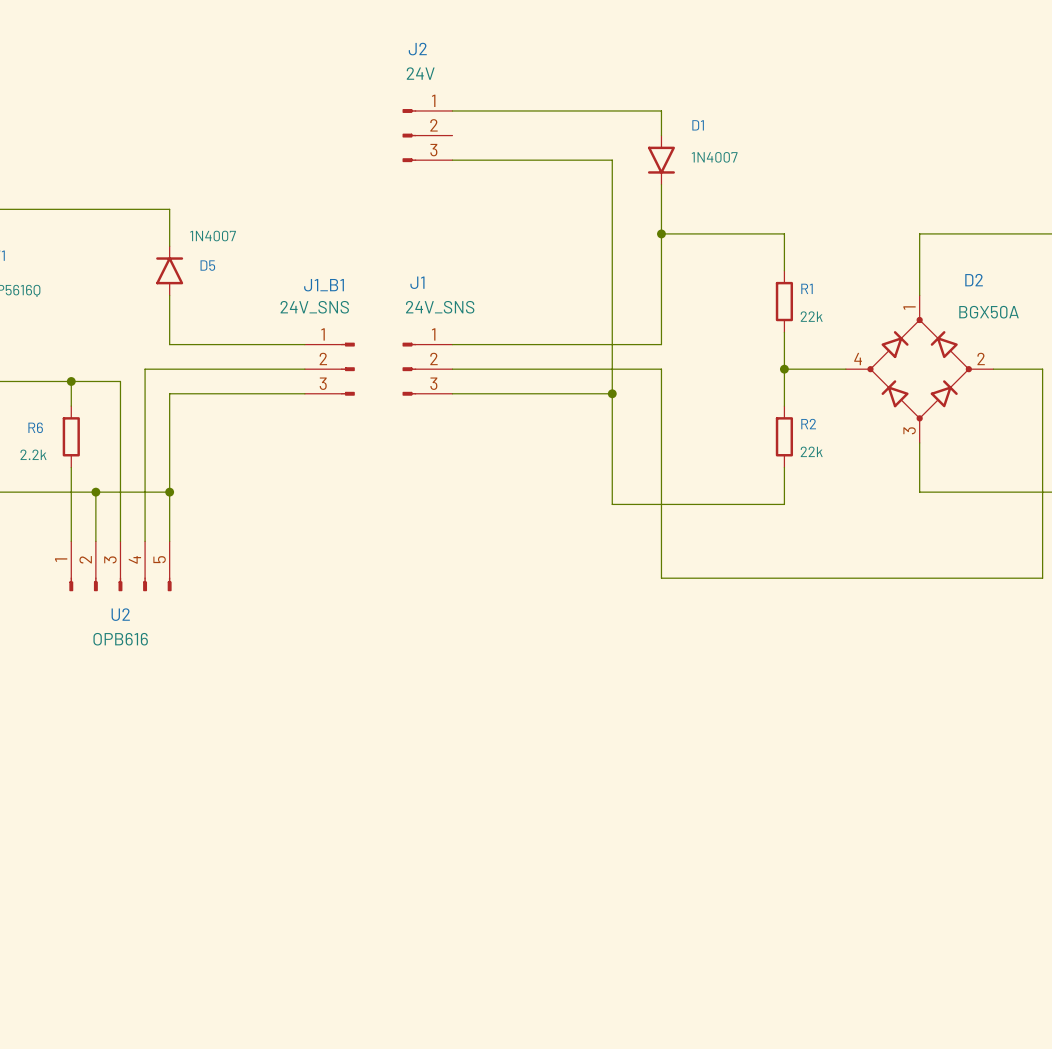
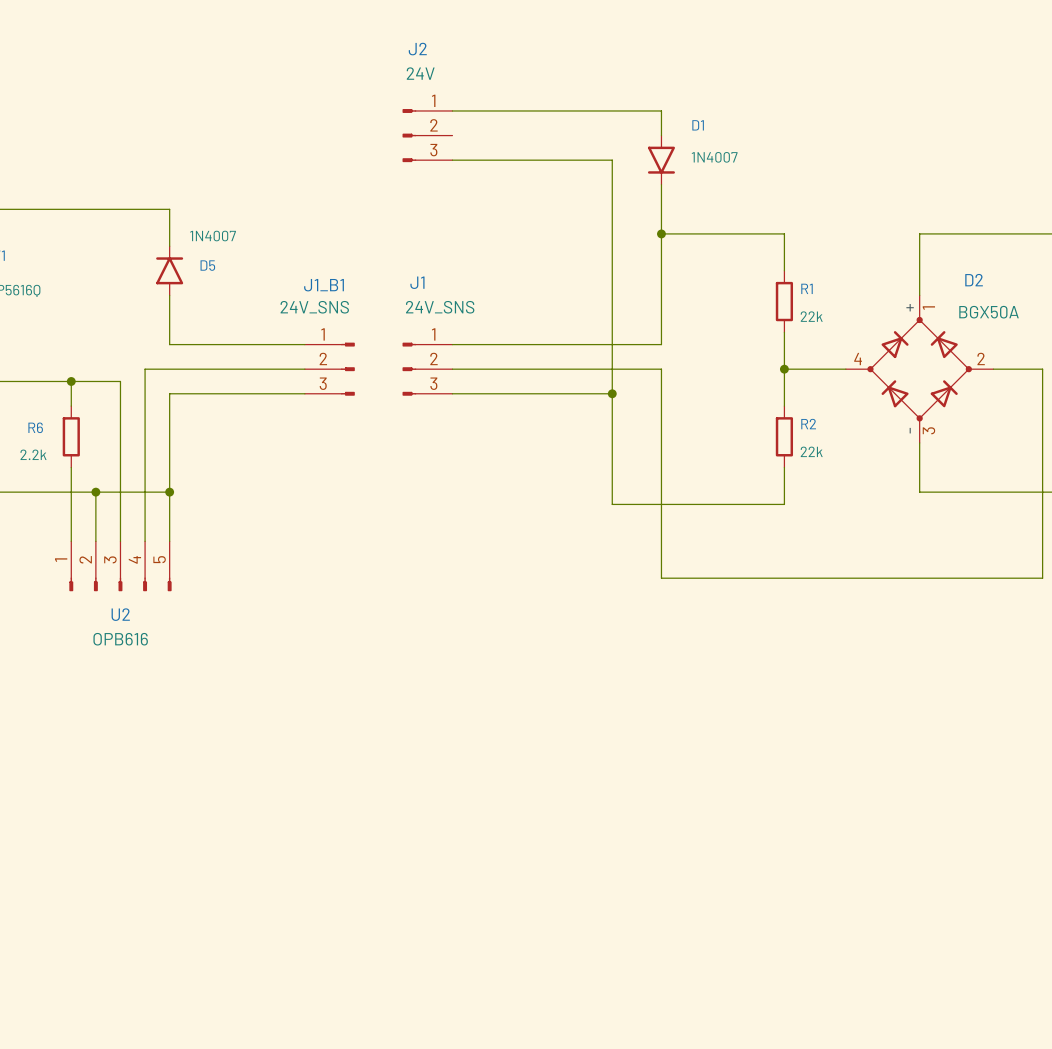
D2 symbol: [845, 295, 994, 443] -> [845, 295, 994, 443]

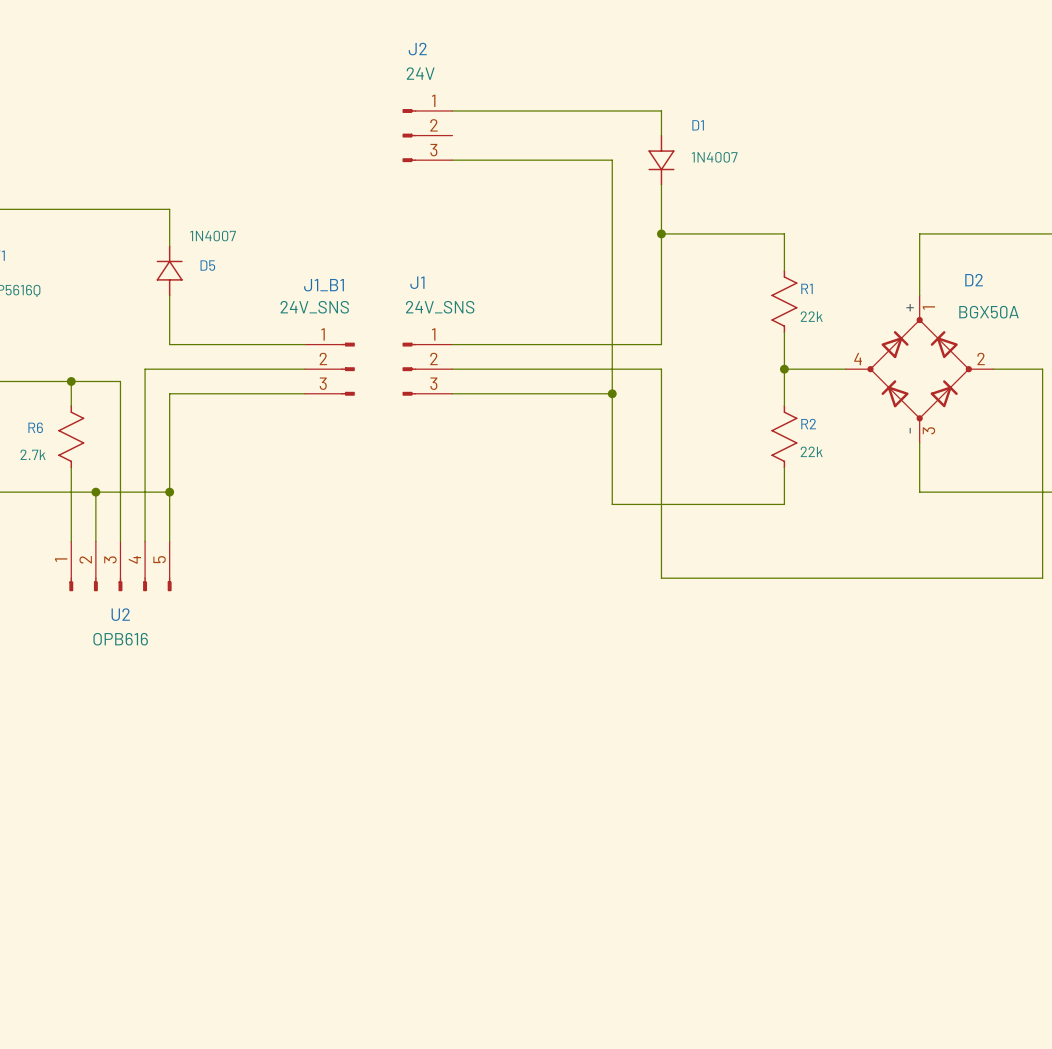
D1 symbol: [647, 135, 675, 185] -> [648, 134, 675, 186]
D5 symbol: [156, 246, 184, 296] -> [156, 245, 183, 297]
R1 symbol: [775, 270, 794, 333] -> [771, 270, 798, 334]
R6 symbol: [62, 406, 80, 468] -> [58, 405, 85, 469]
R2 symbol: [775, 406, 794, 468] -> [771, 405, 798, 469]
R6 value: 2.2k (33, 454) -> 2.7k (33, 454)

